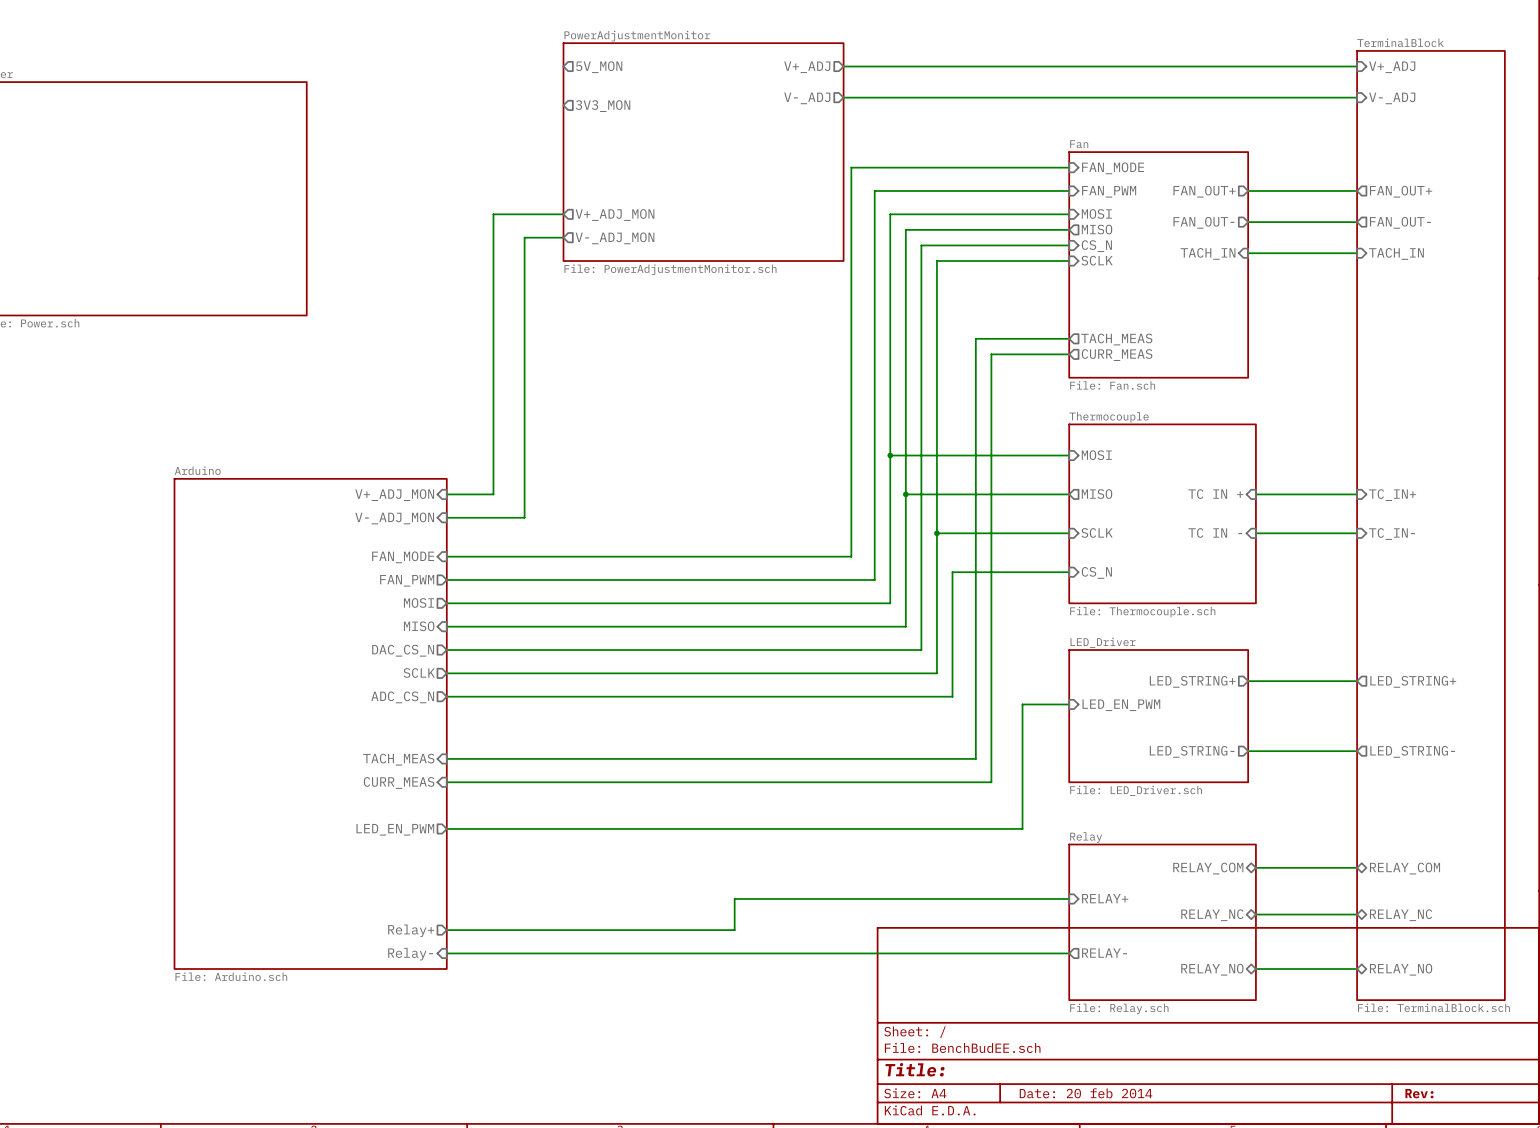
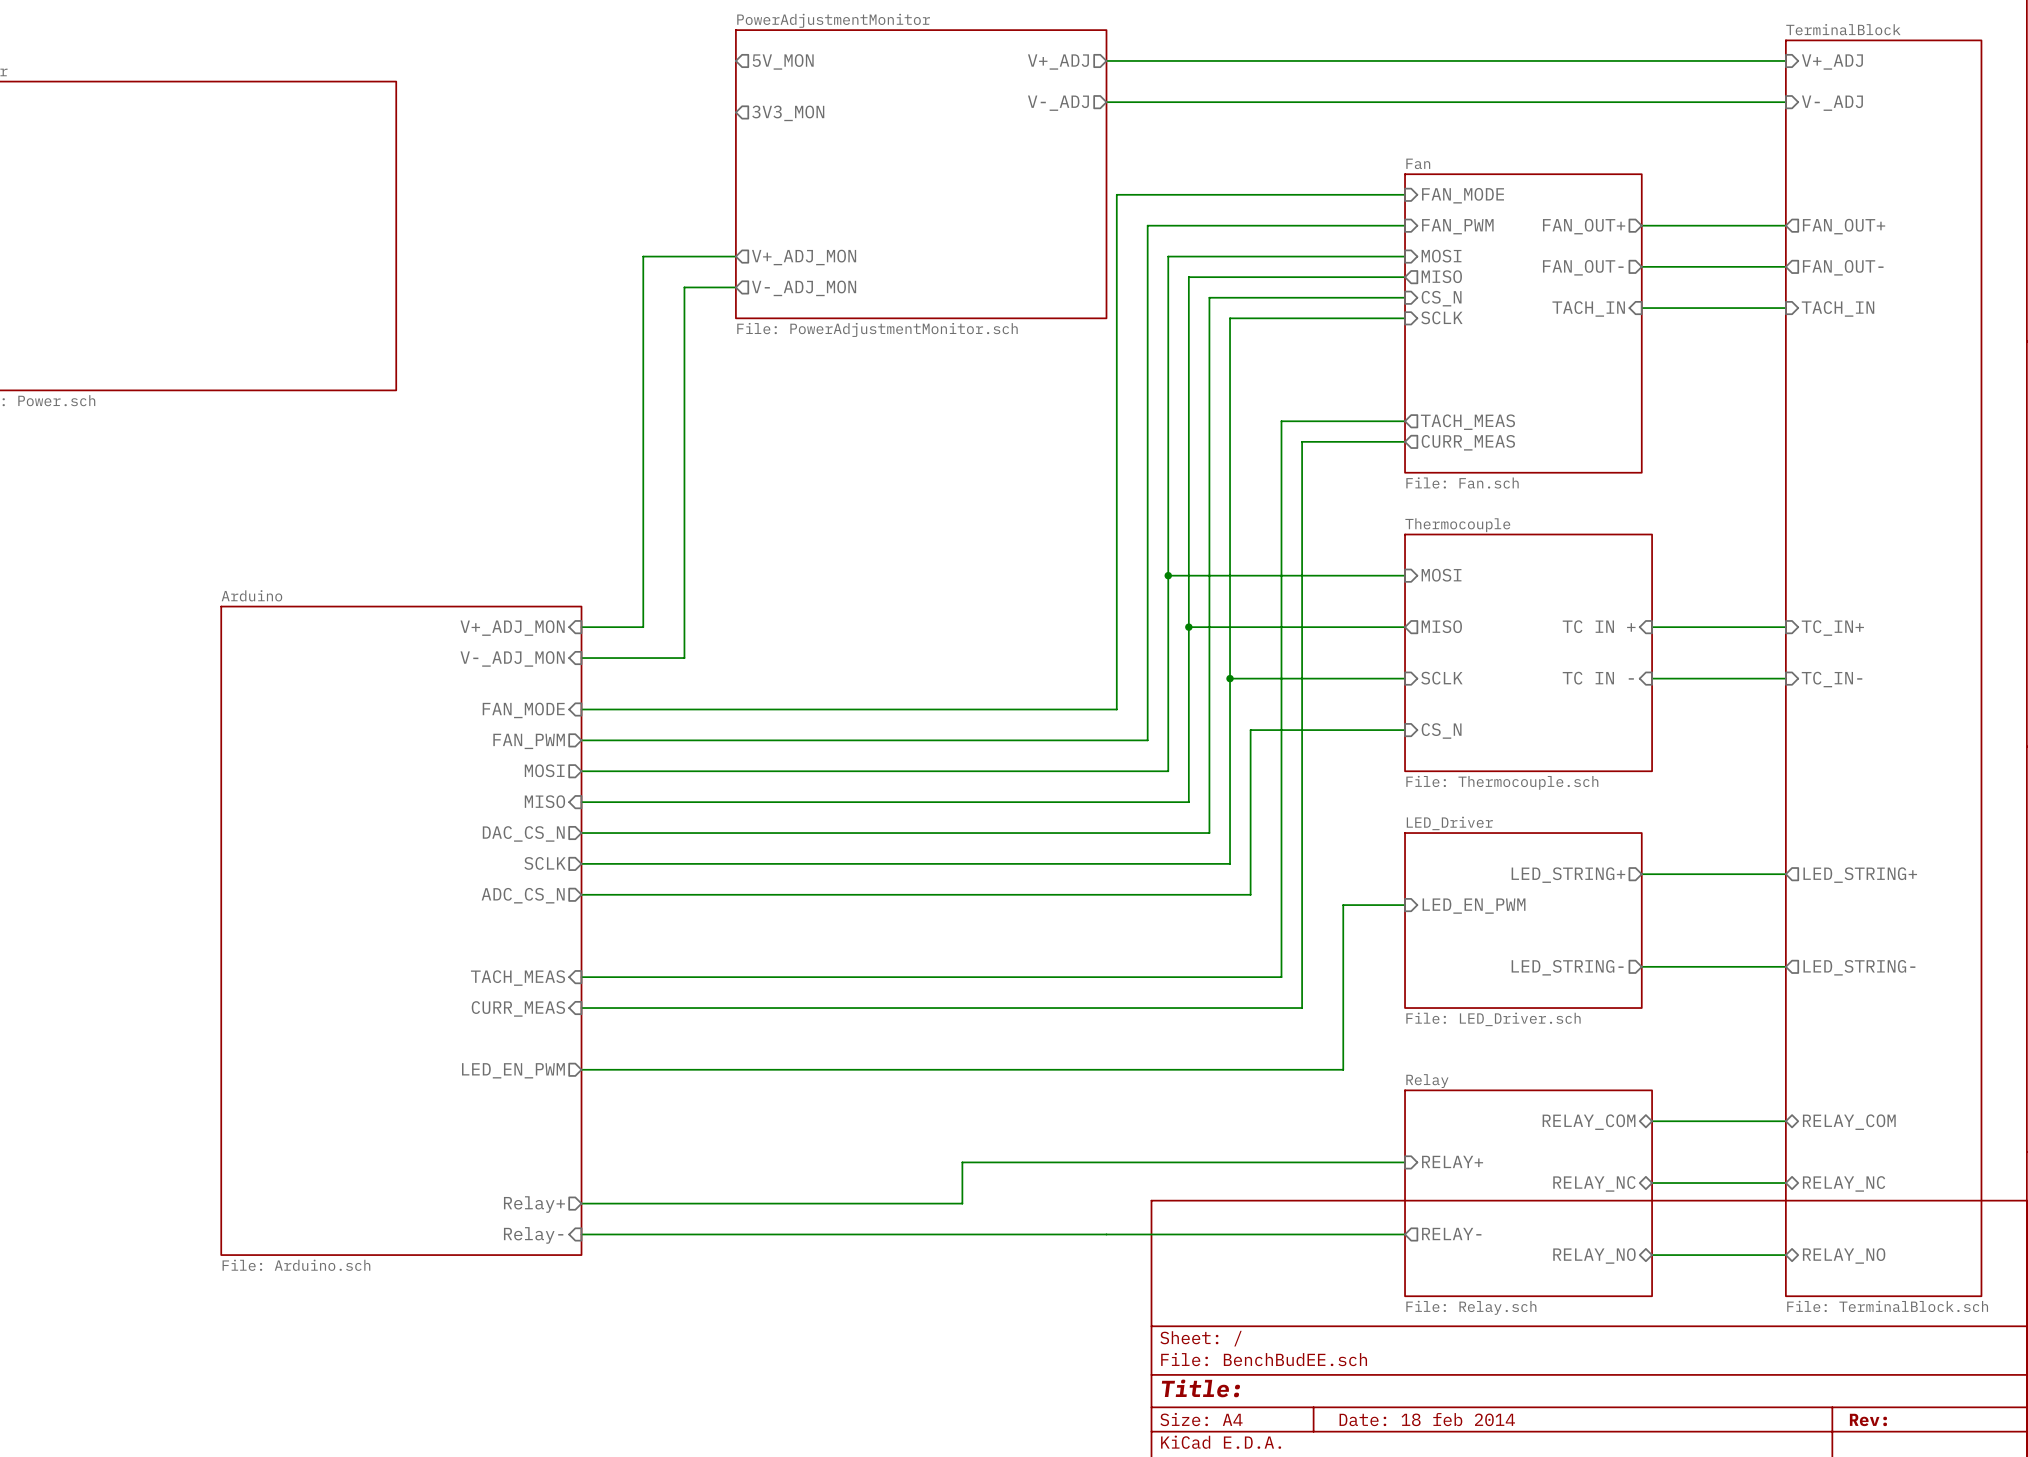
title block: Date: 20 feb 2014 (1086, 1093) -> Date: 18 feb 2014 (1427, 1419)

